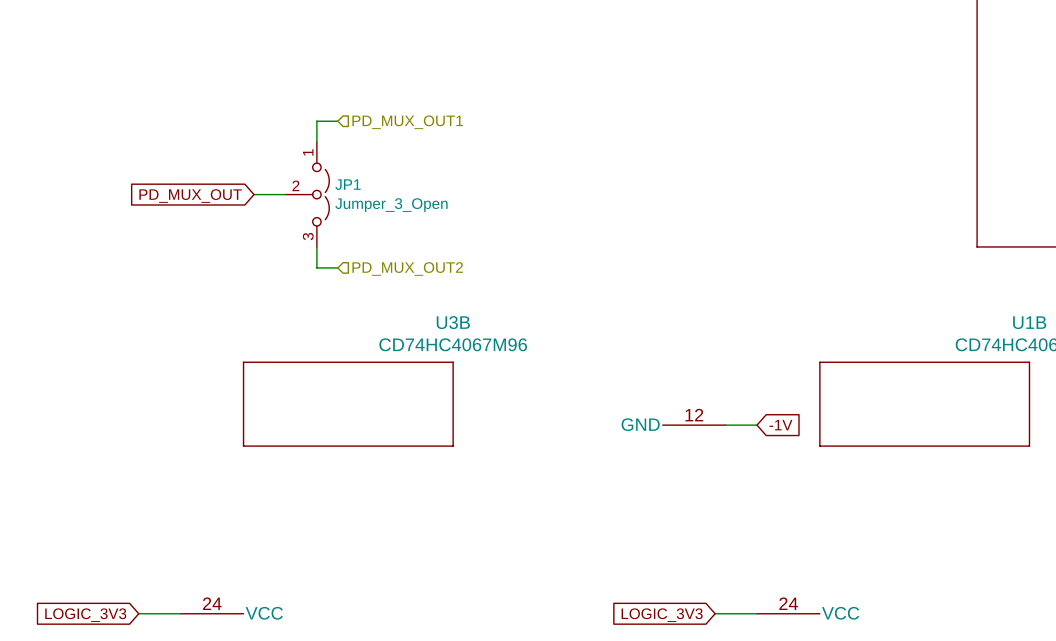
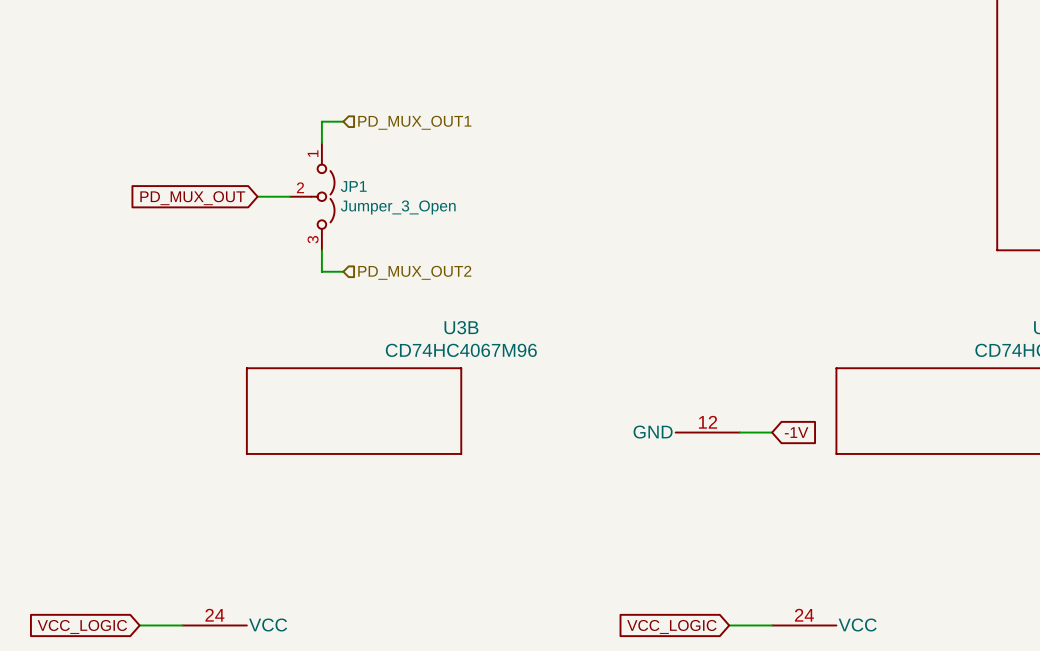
global label: LOGIC_3V3 (85, 615) -> VCC_LOGIC (82, 626)
global label: LOGIC_3V3 (662, 615) -> VCC_LOGIC (671, 626)

